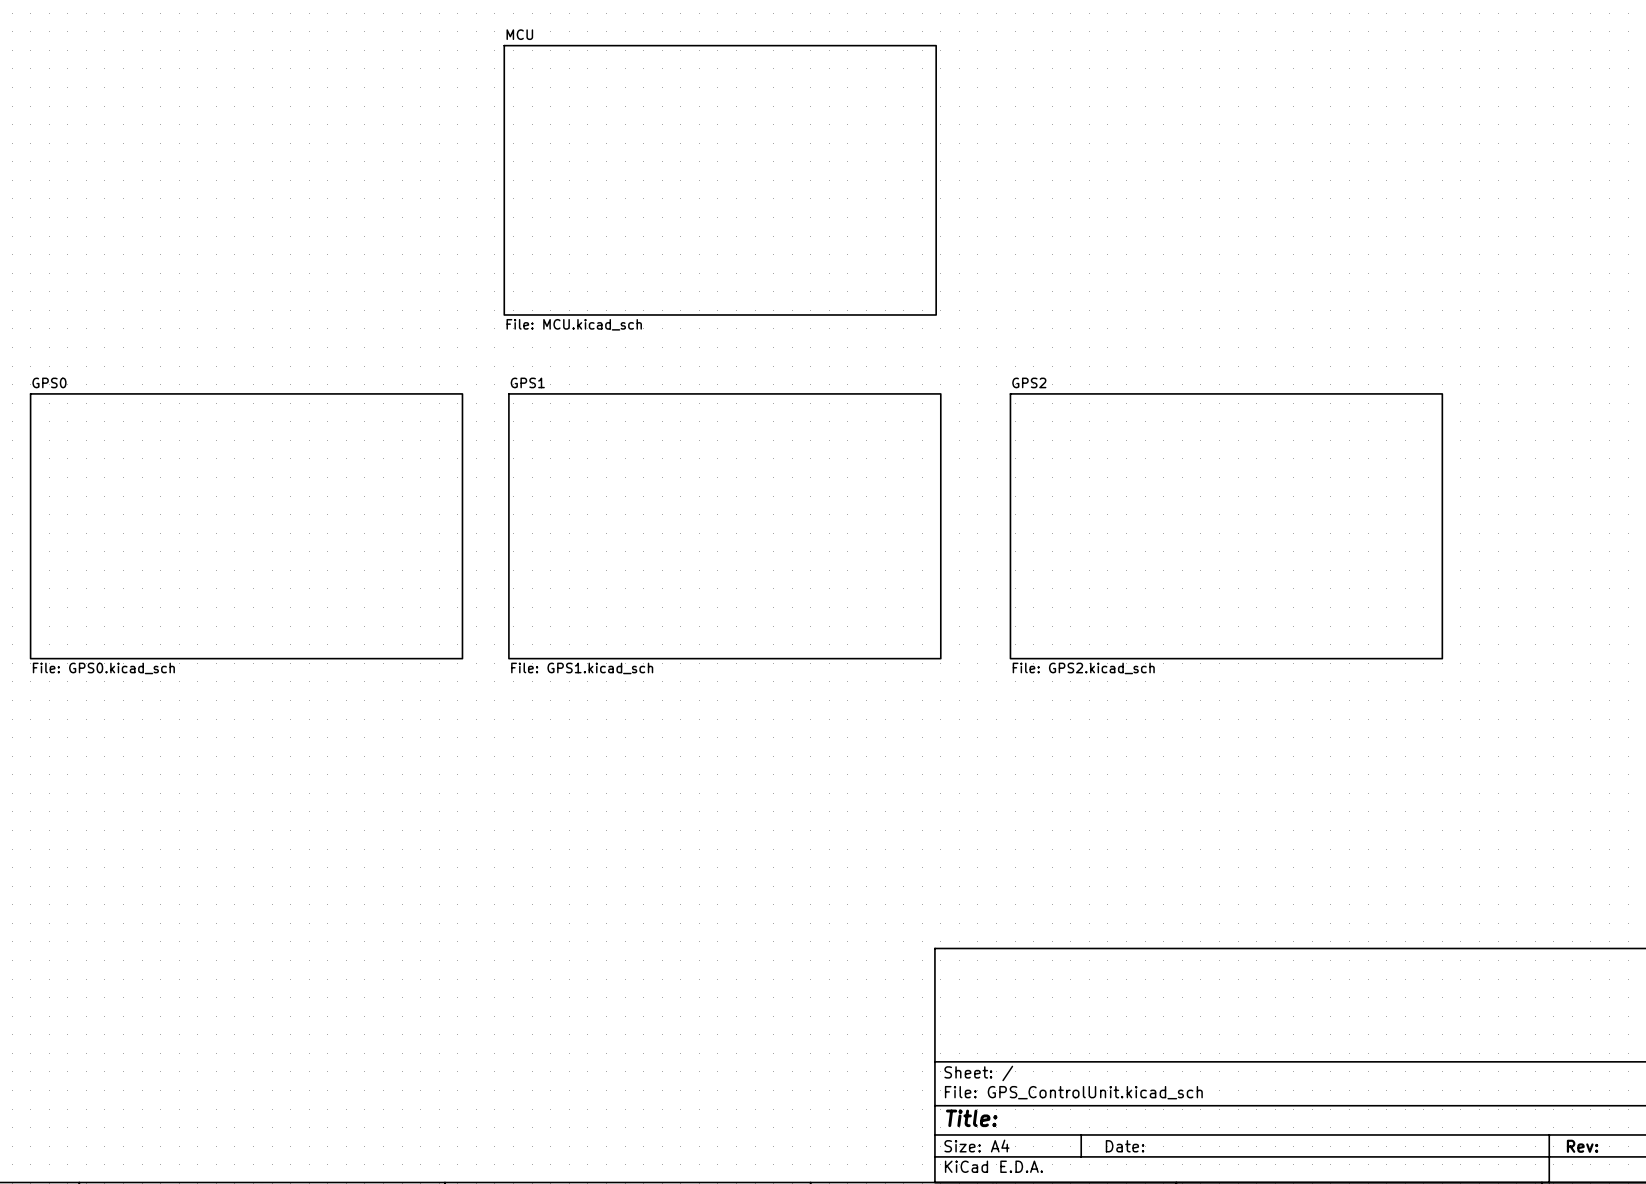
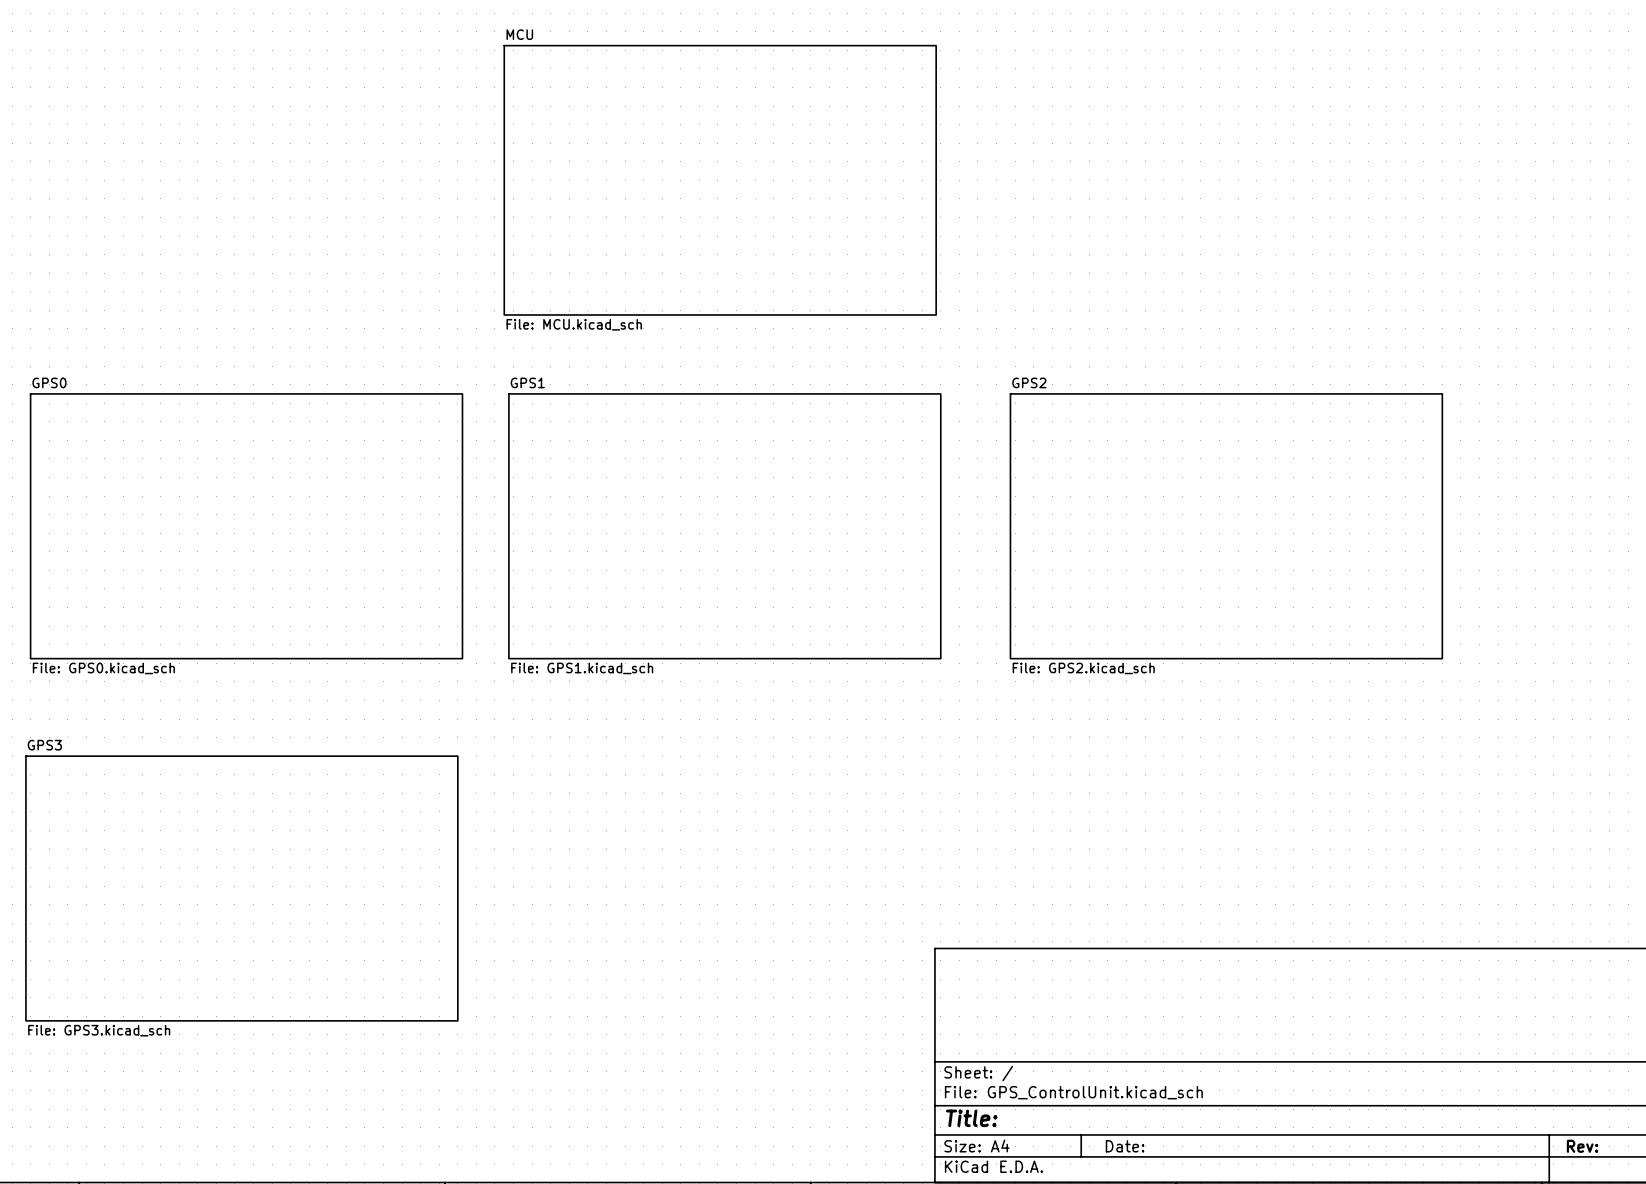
sheet GPS3: none -> File: GPS3.kicad_sch (241, 888)

